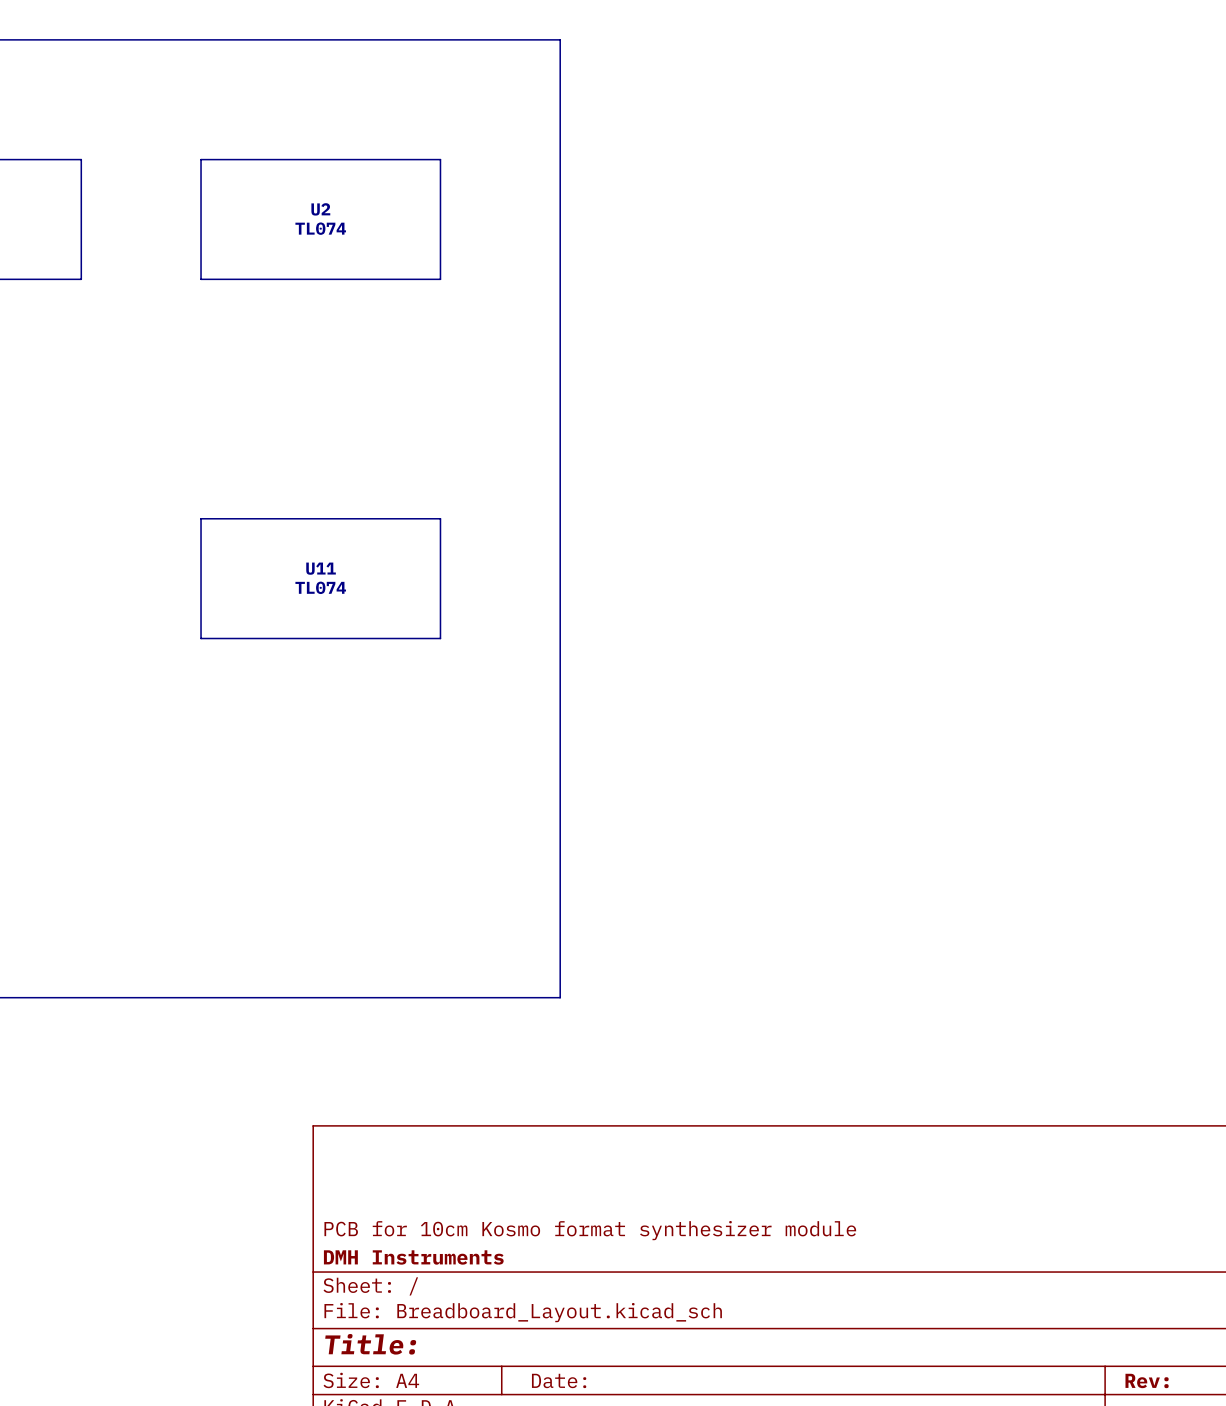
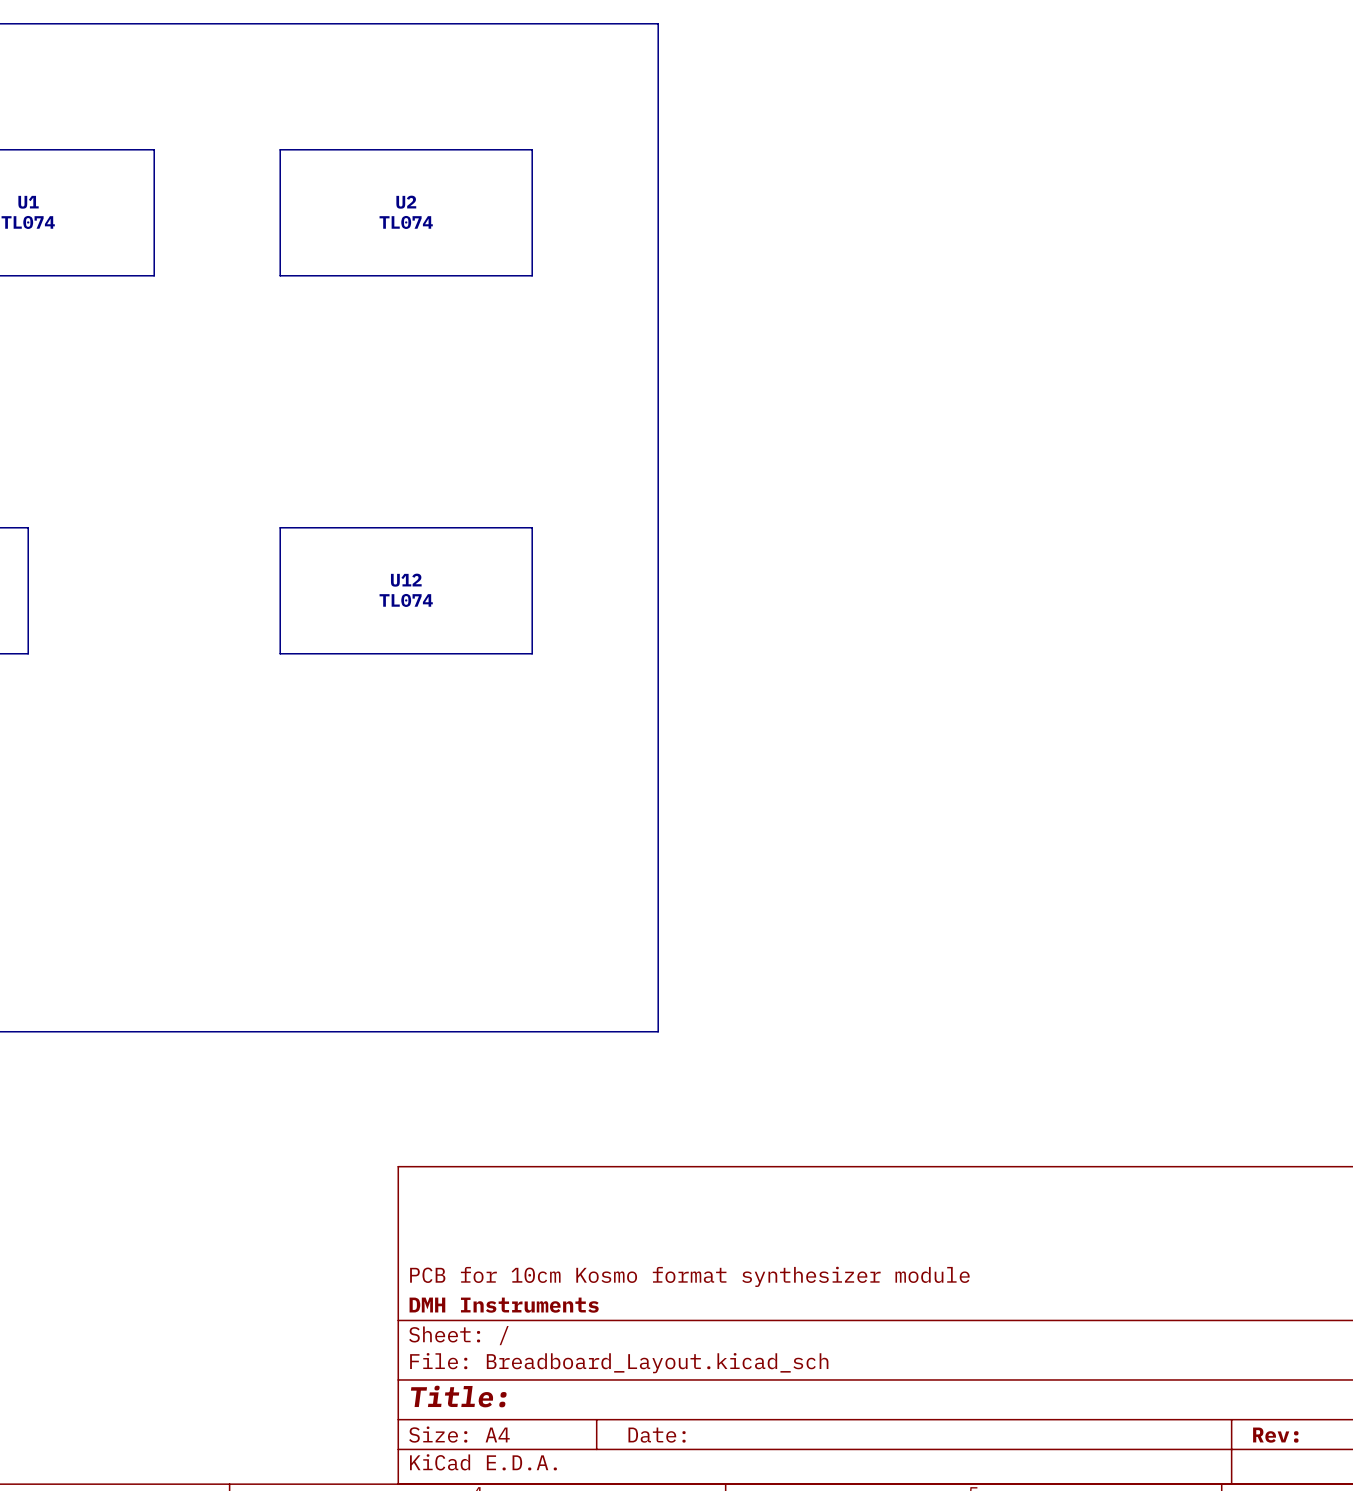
text: U11 (321, 568) -> U12 (406, 580)

